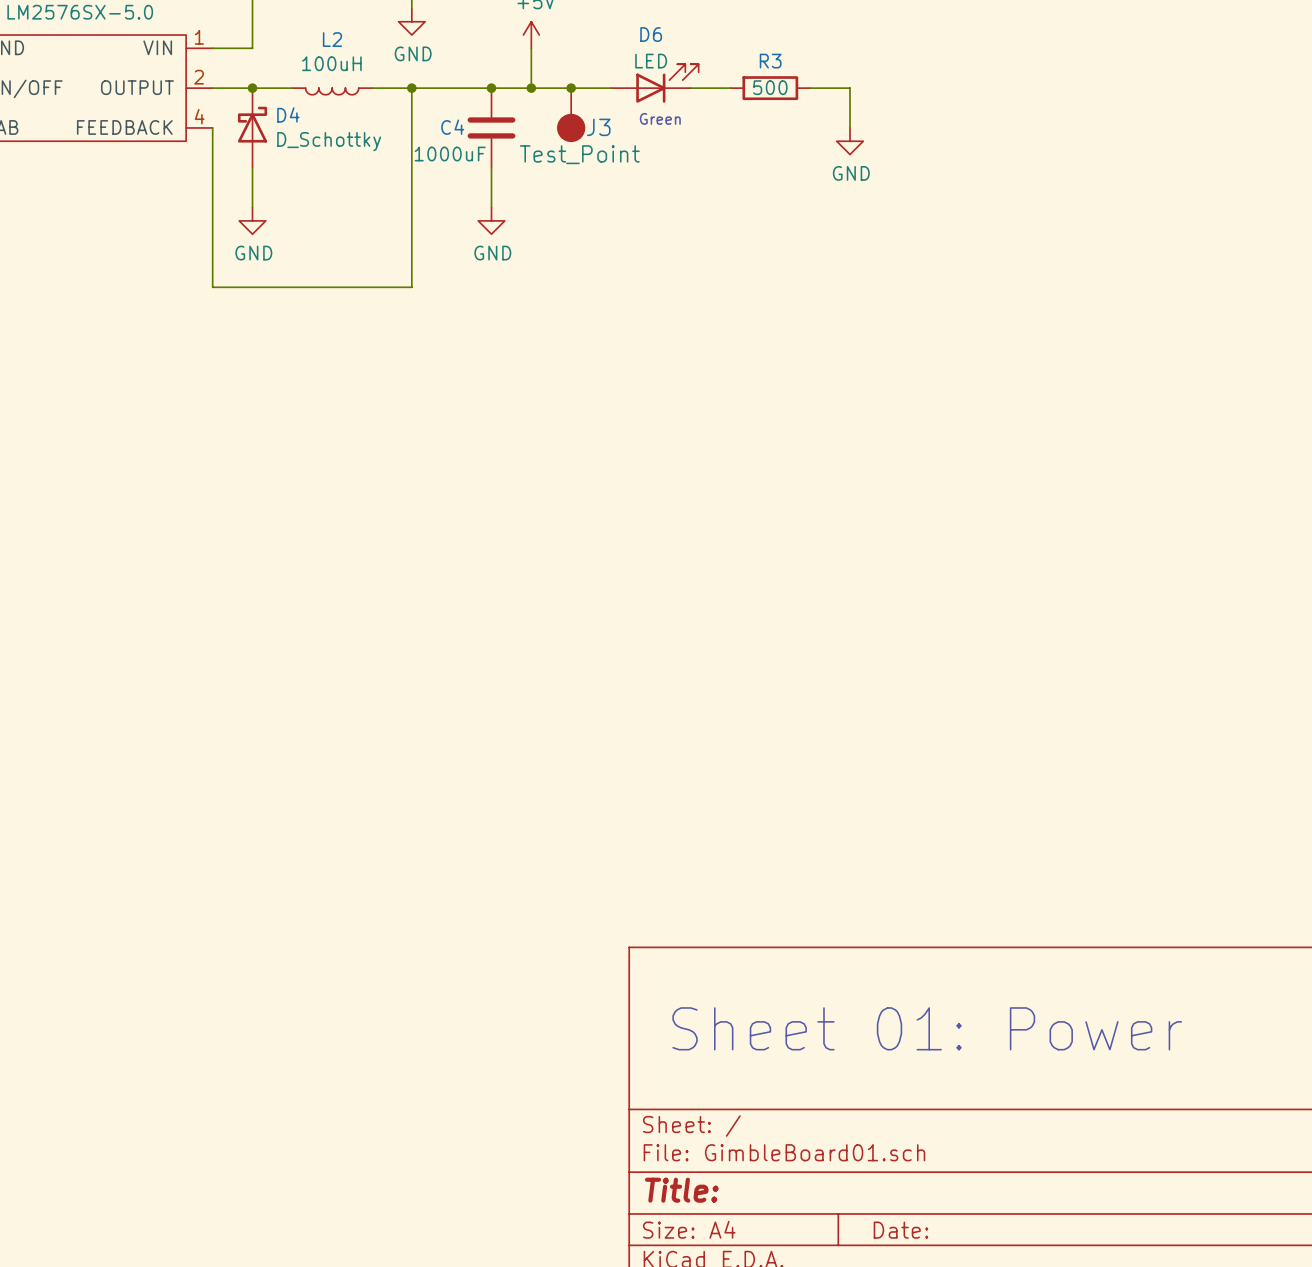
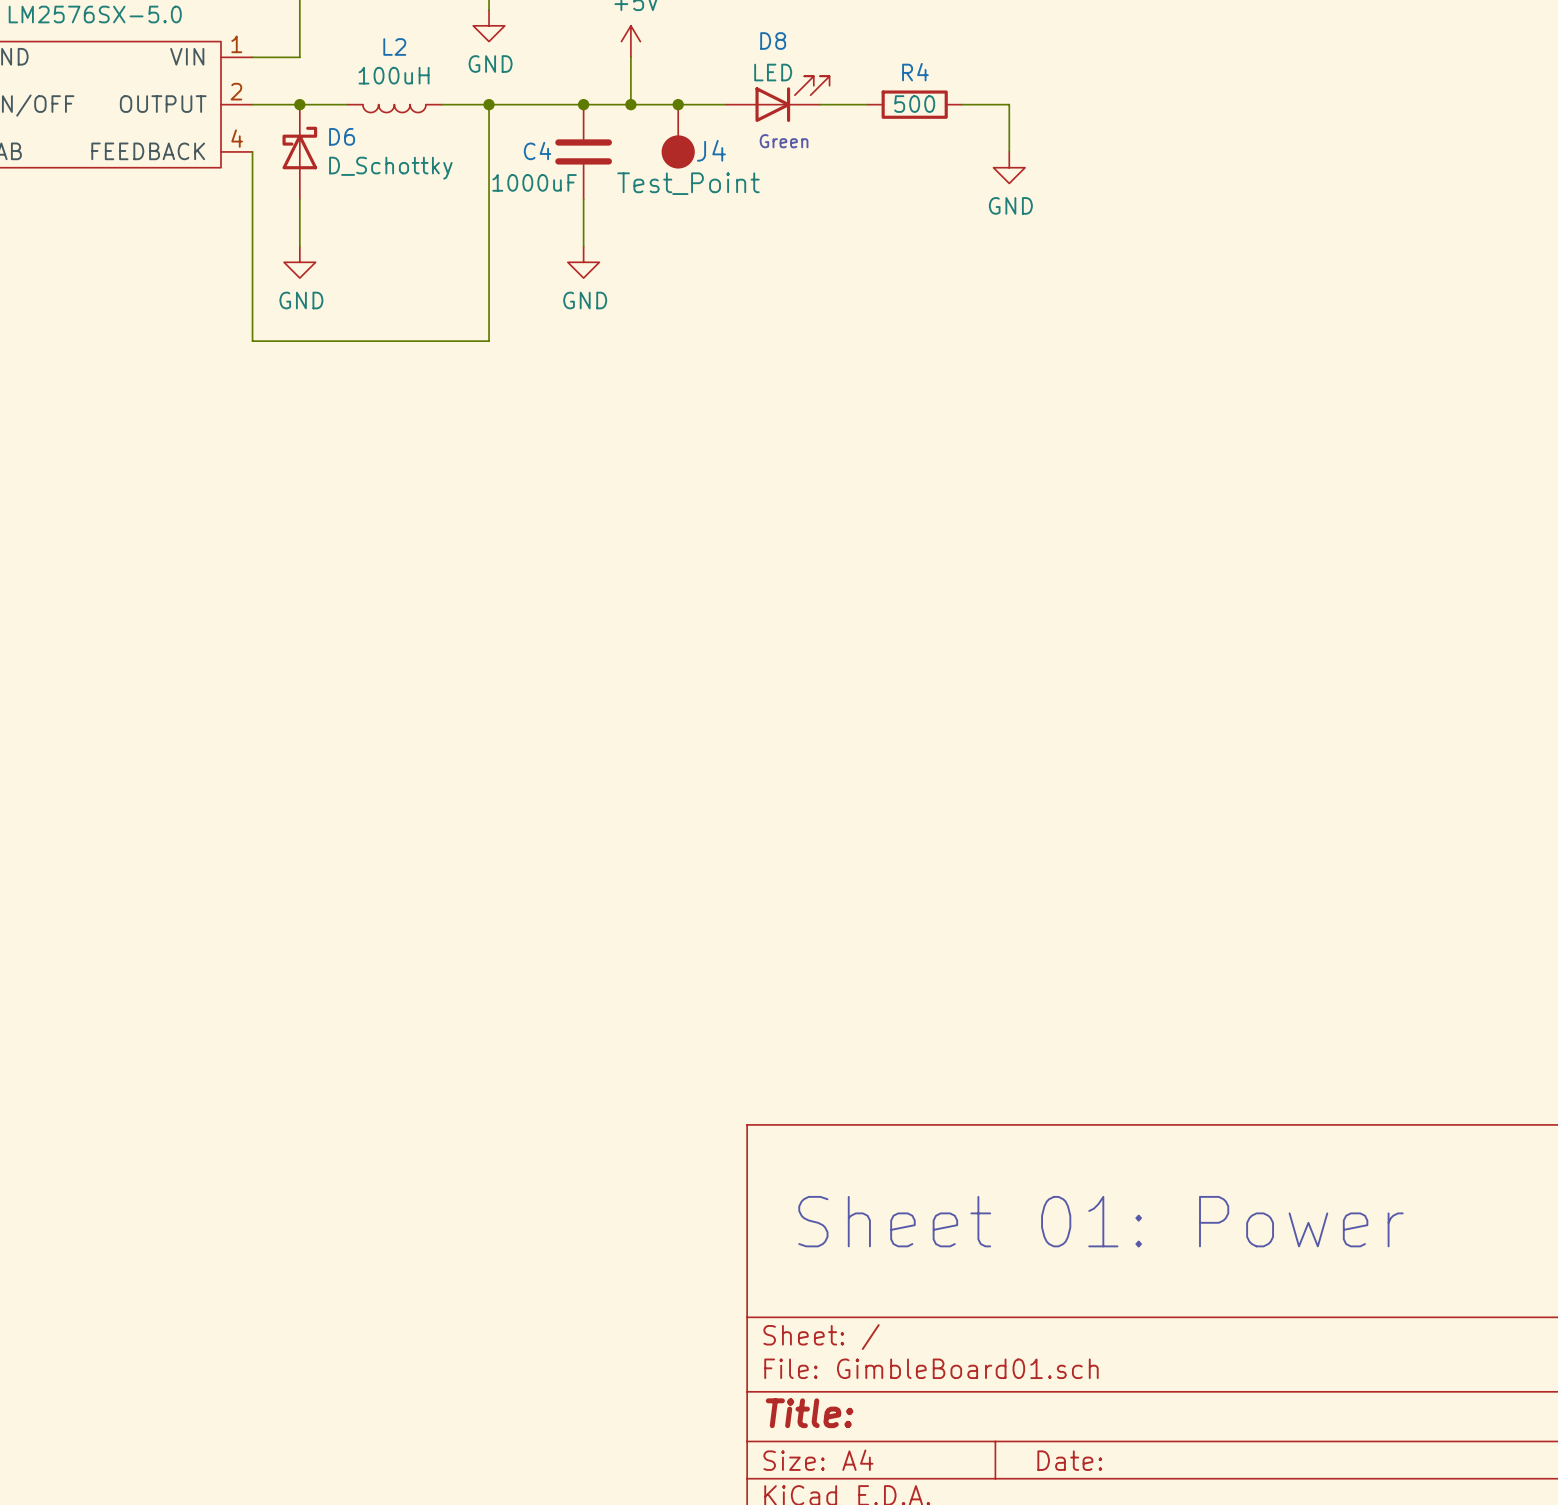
D6 name: D6 (651, 34) -> D8 (773, 41)
R3 name: R3 (770, 61) -> R4 (915, 72)
D4 name: D4 (288, 114) -> D6 (342, 136)
J3 name: J3 (598, 127) -> J4 (711, 150)

